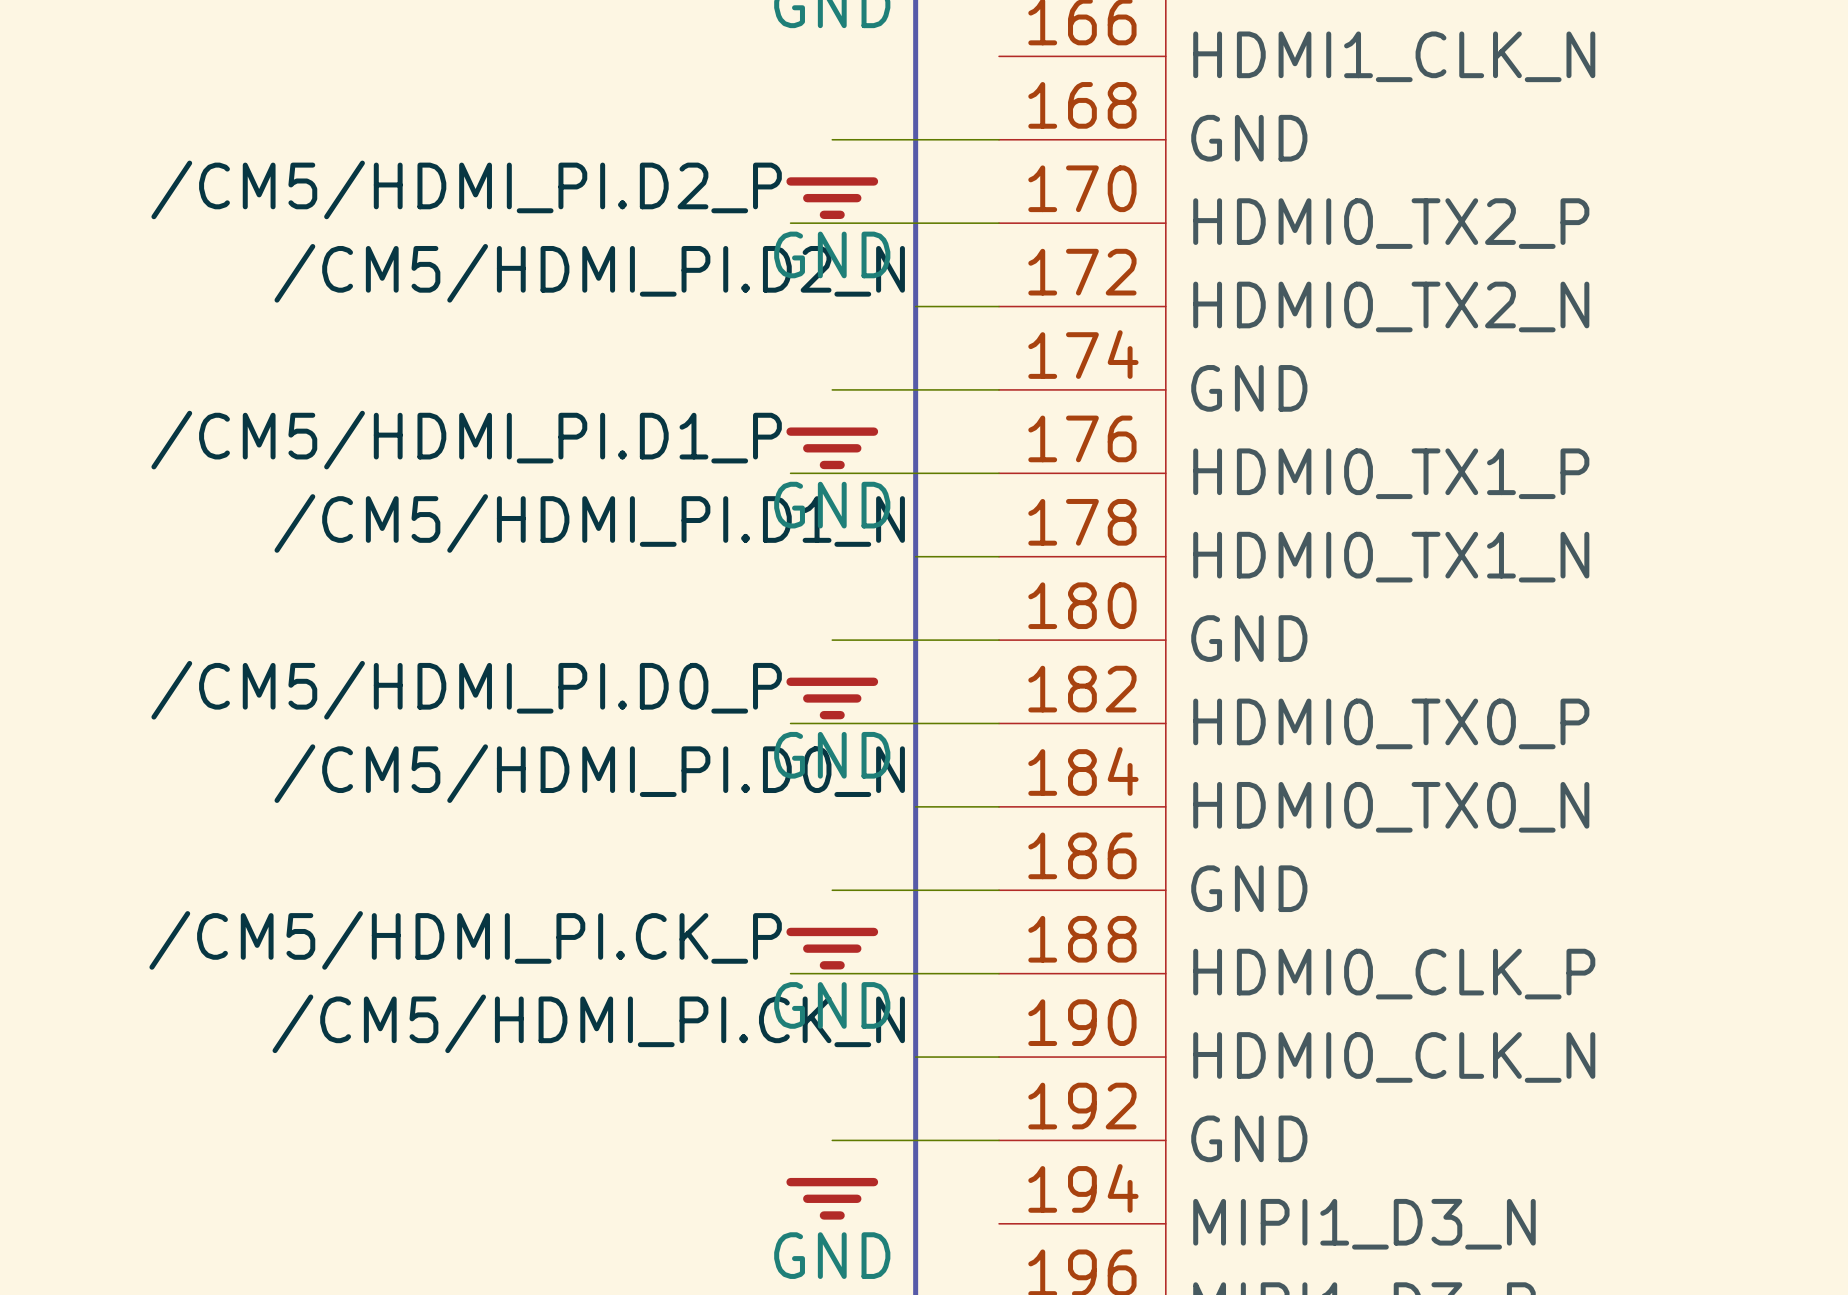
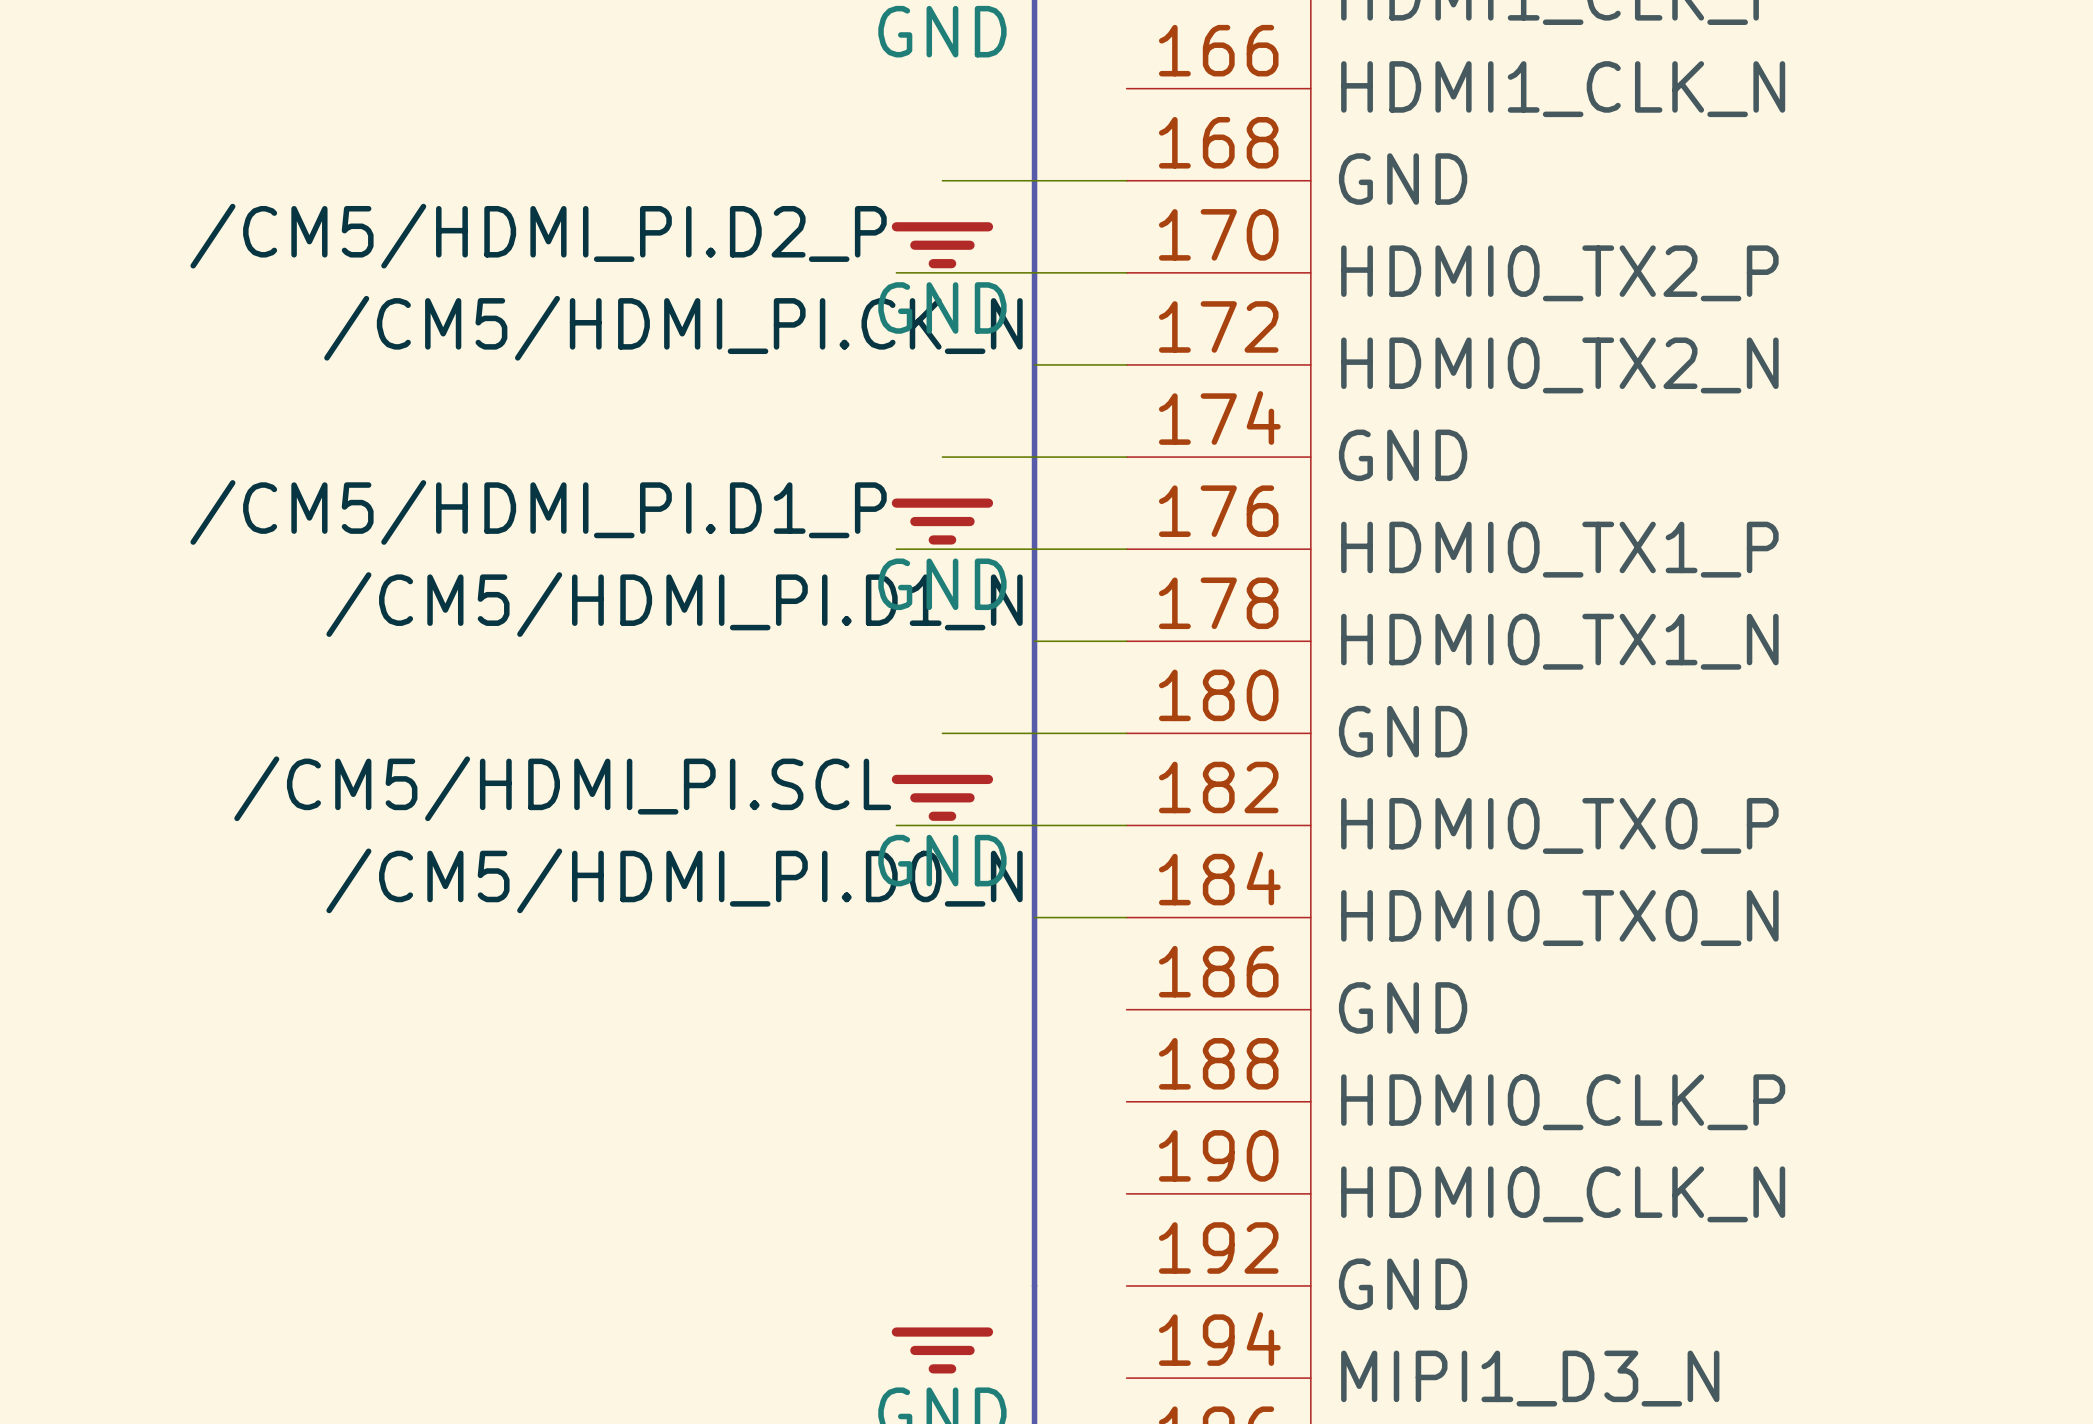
label: /CM5/HDMI_PI.D2_N (589, 273) -> /CM5/HDMI_PI.CK_N (673, 328)
label: /CM5/HDMI_PI.D0_P (466, 690) -> /CM5/HDMI_PI.SCL (562, 788)
wire: (832, 890) (999, 890) -> none
label: /CM5/HDMI_PI.CK_P (465, 940) -> none
power symbol: GND (832, 948) -> none
wire: (790, 973) (999, 973) -> none
label: /CM5/HDMI_PI.CK_N (588, 1023) -> none
wire: (915, 1057) (999, 1057) -> none
wire: (832, 1140) (999, 1140) -> none

